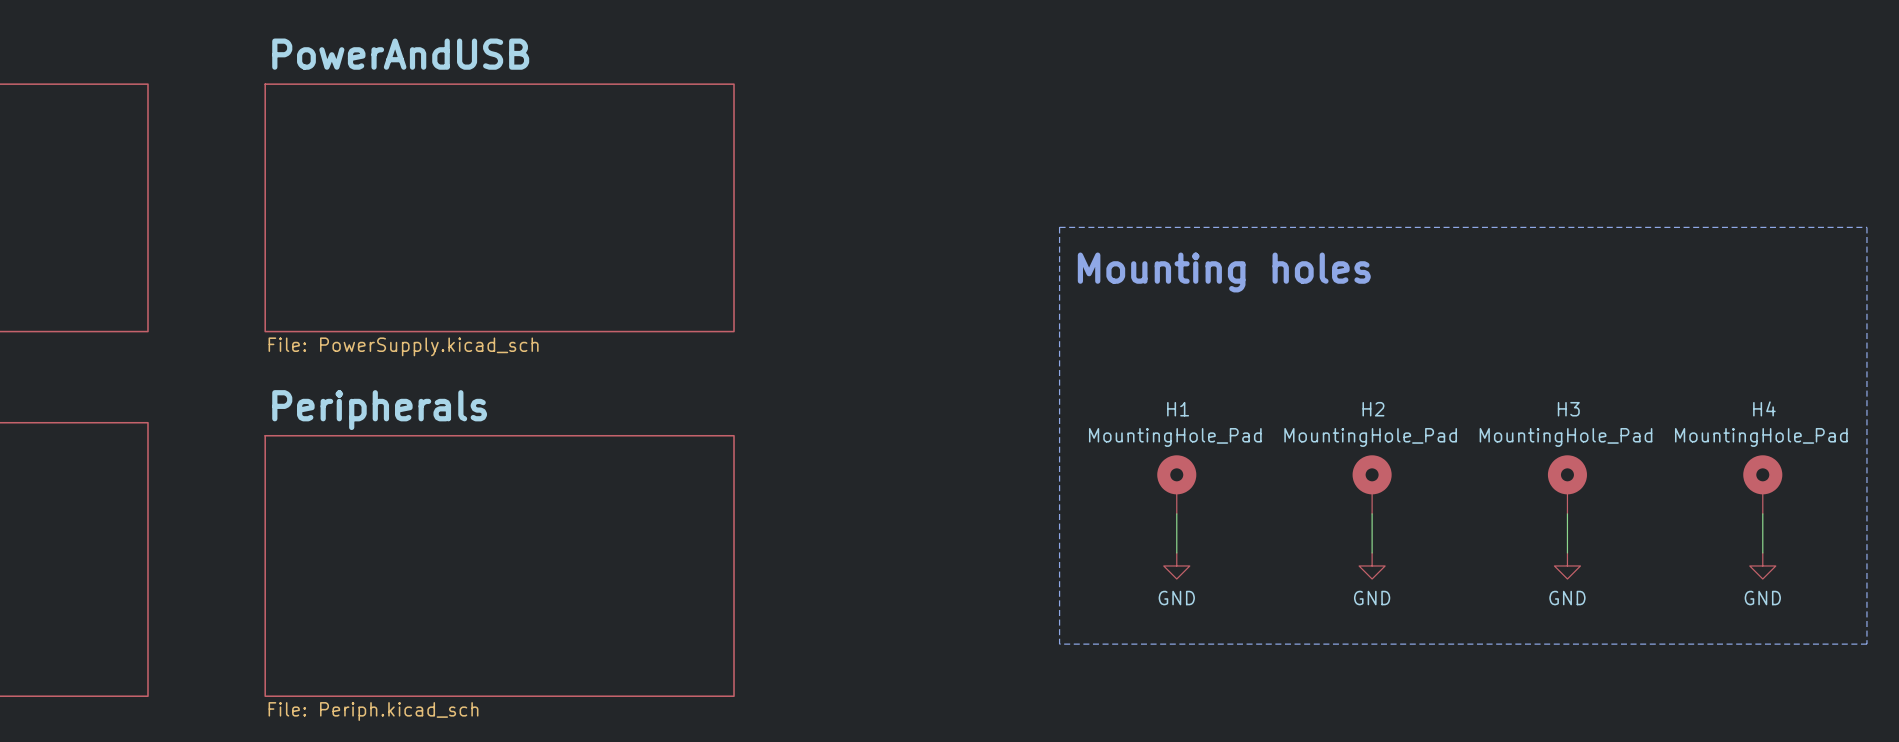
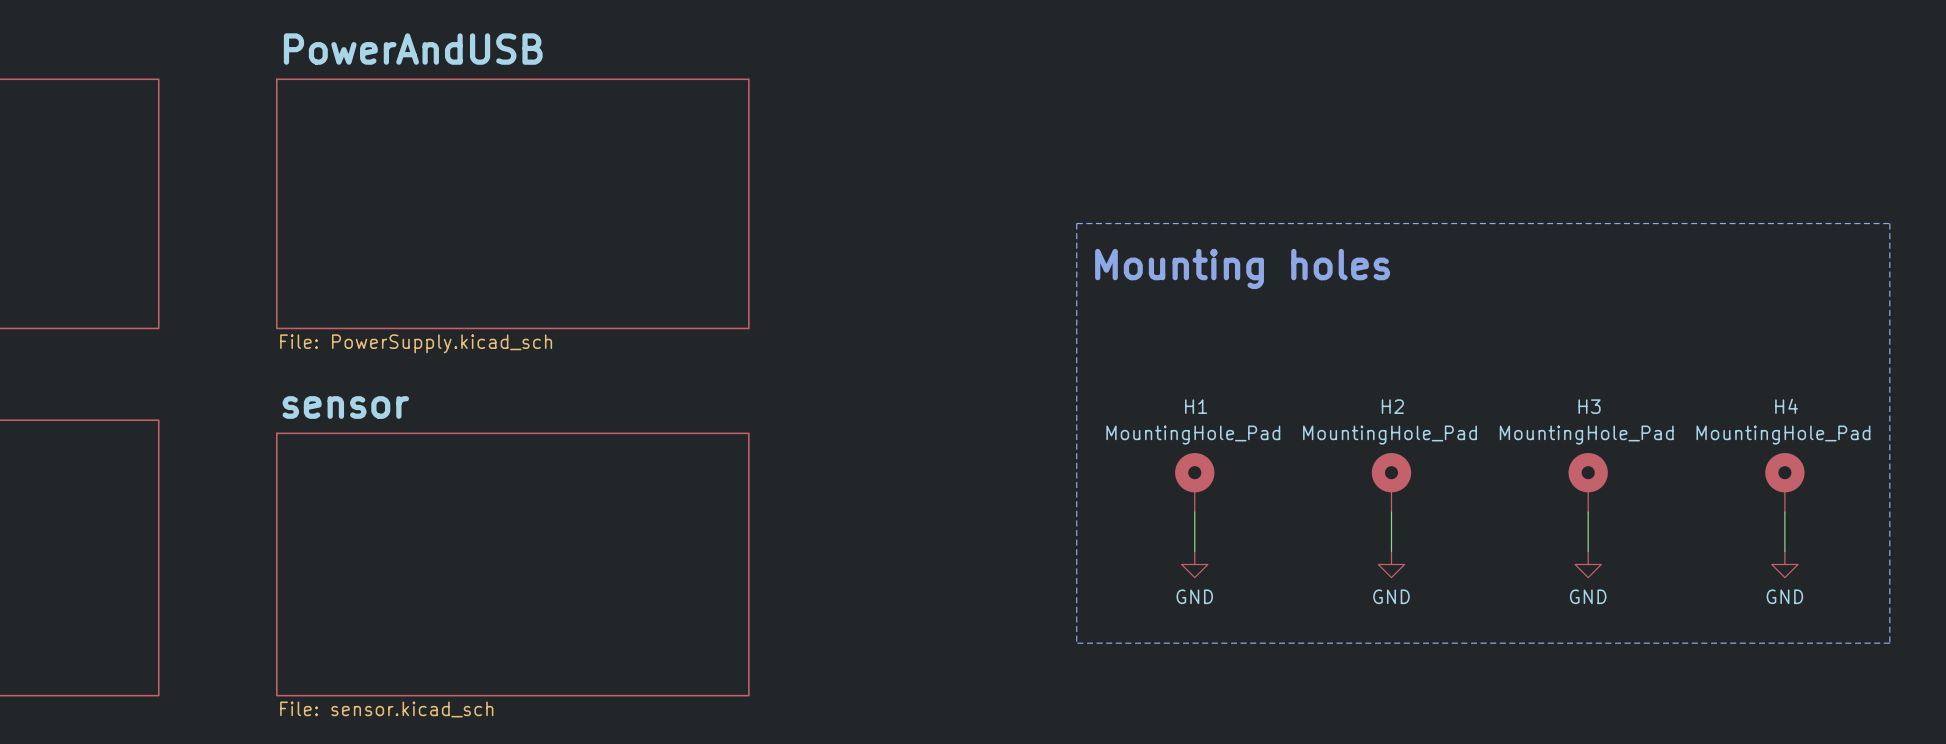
sheet Peripherals name: Peripherals (379, 410) -> sensor (345, 407)
sheet Peripherals value: File: Periph.kicad_sch (373, 711) -> File: sensor.kicad_sch (386, 709)

